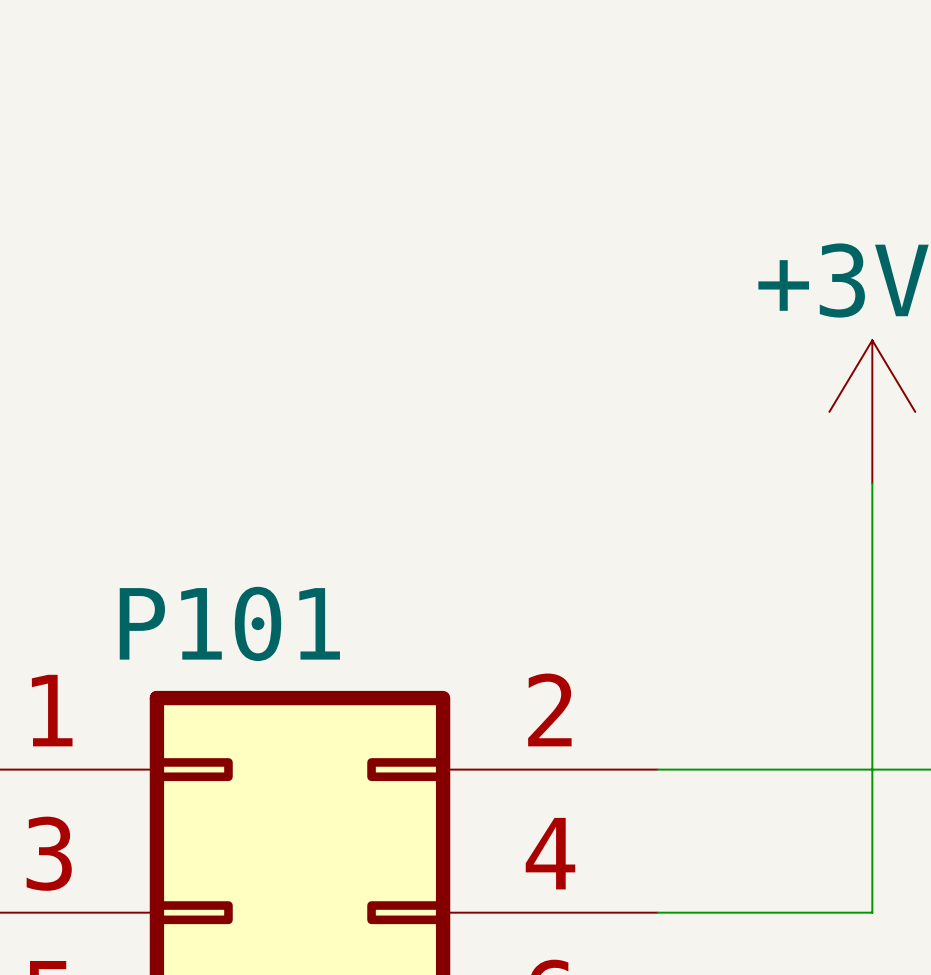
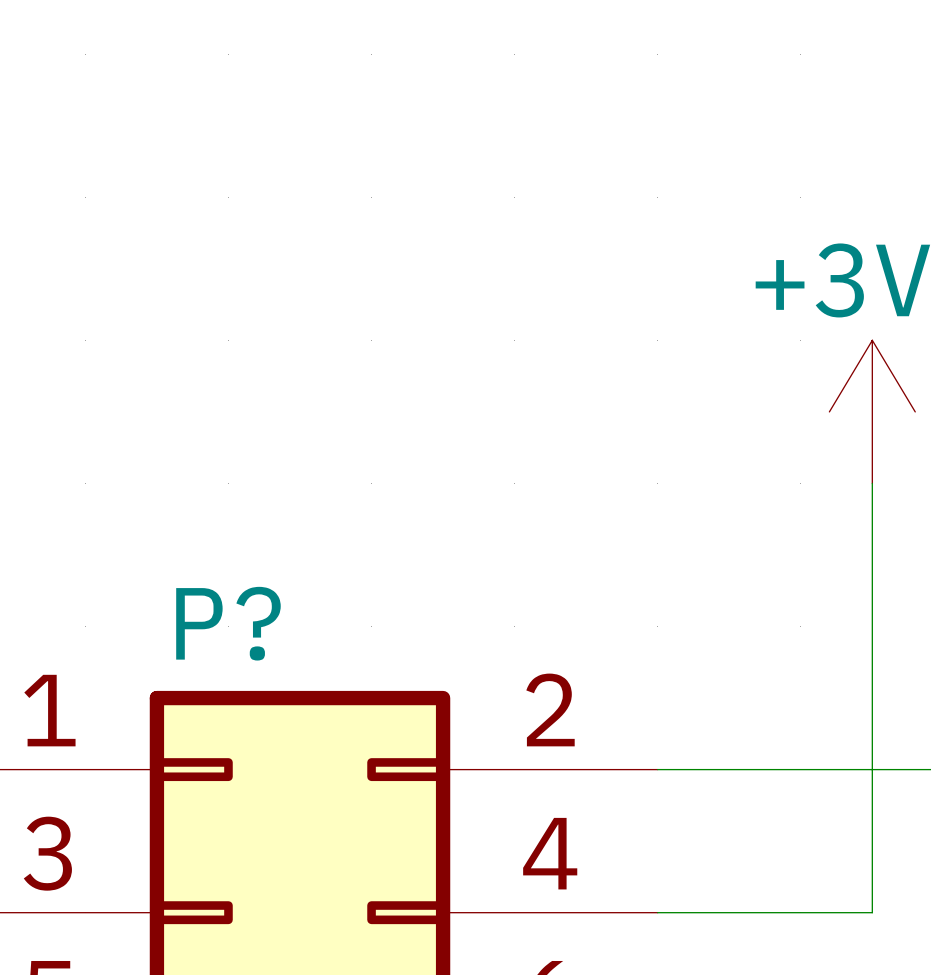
P101 name: P101 (229, 623) -> P? (228, 623)

